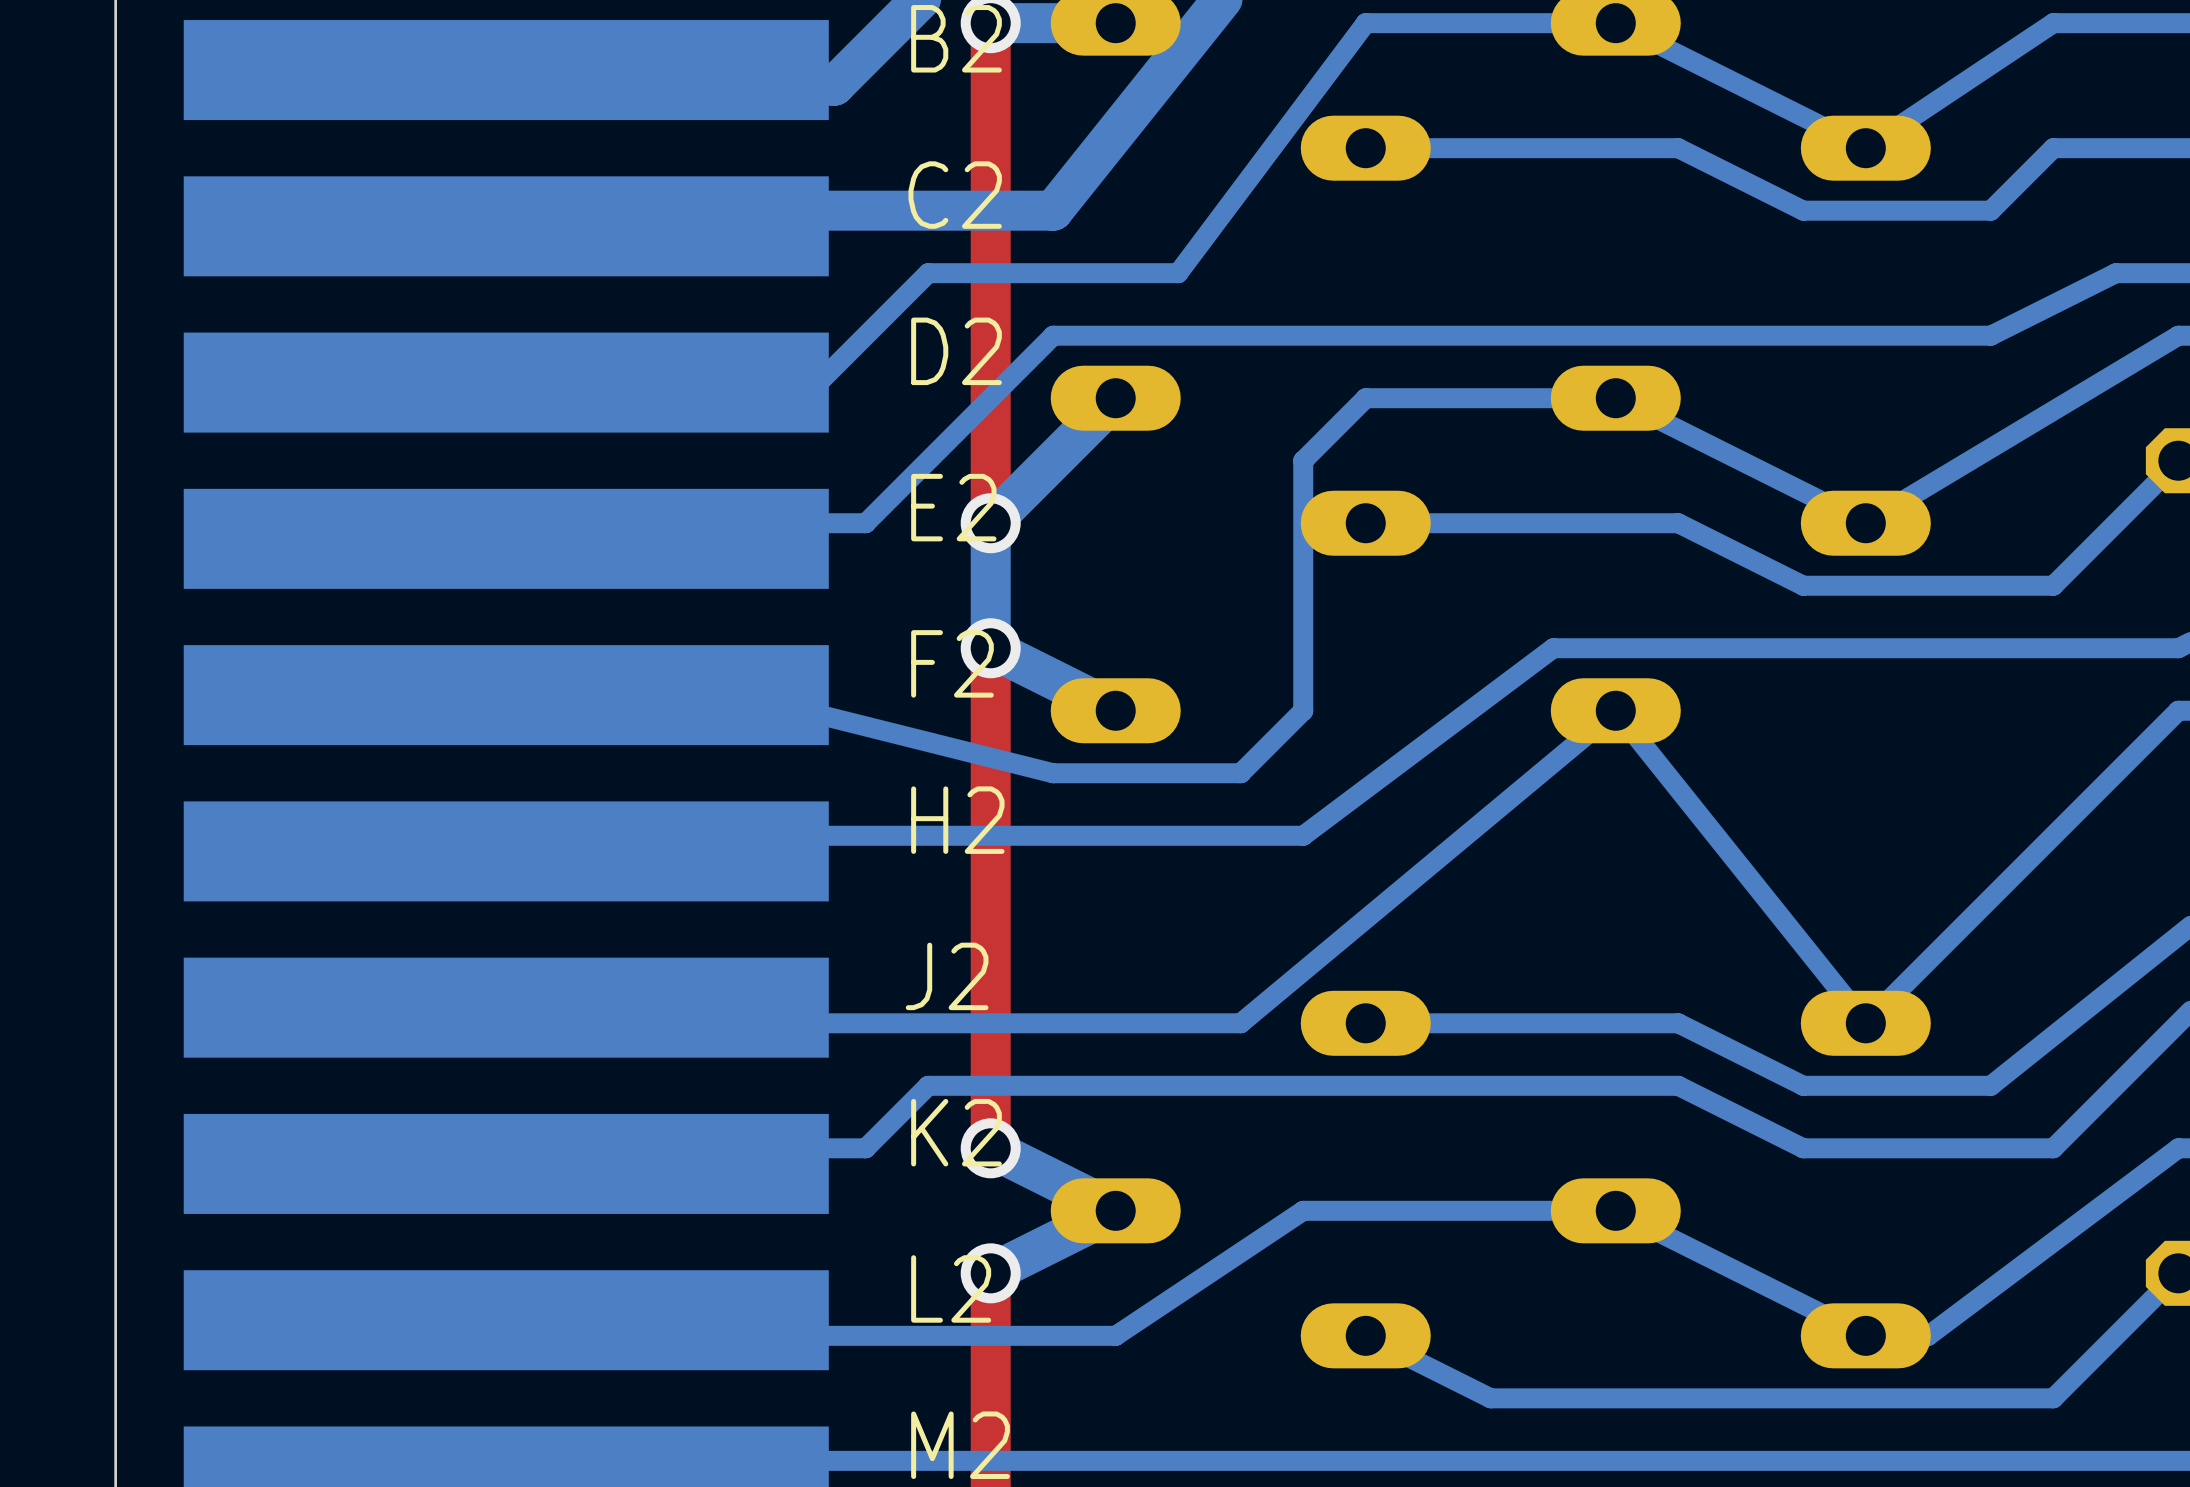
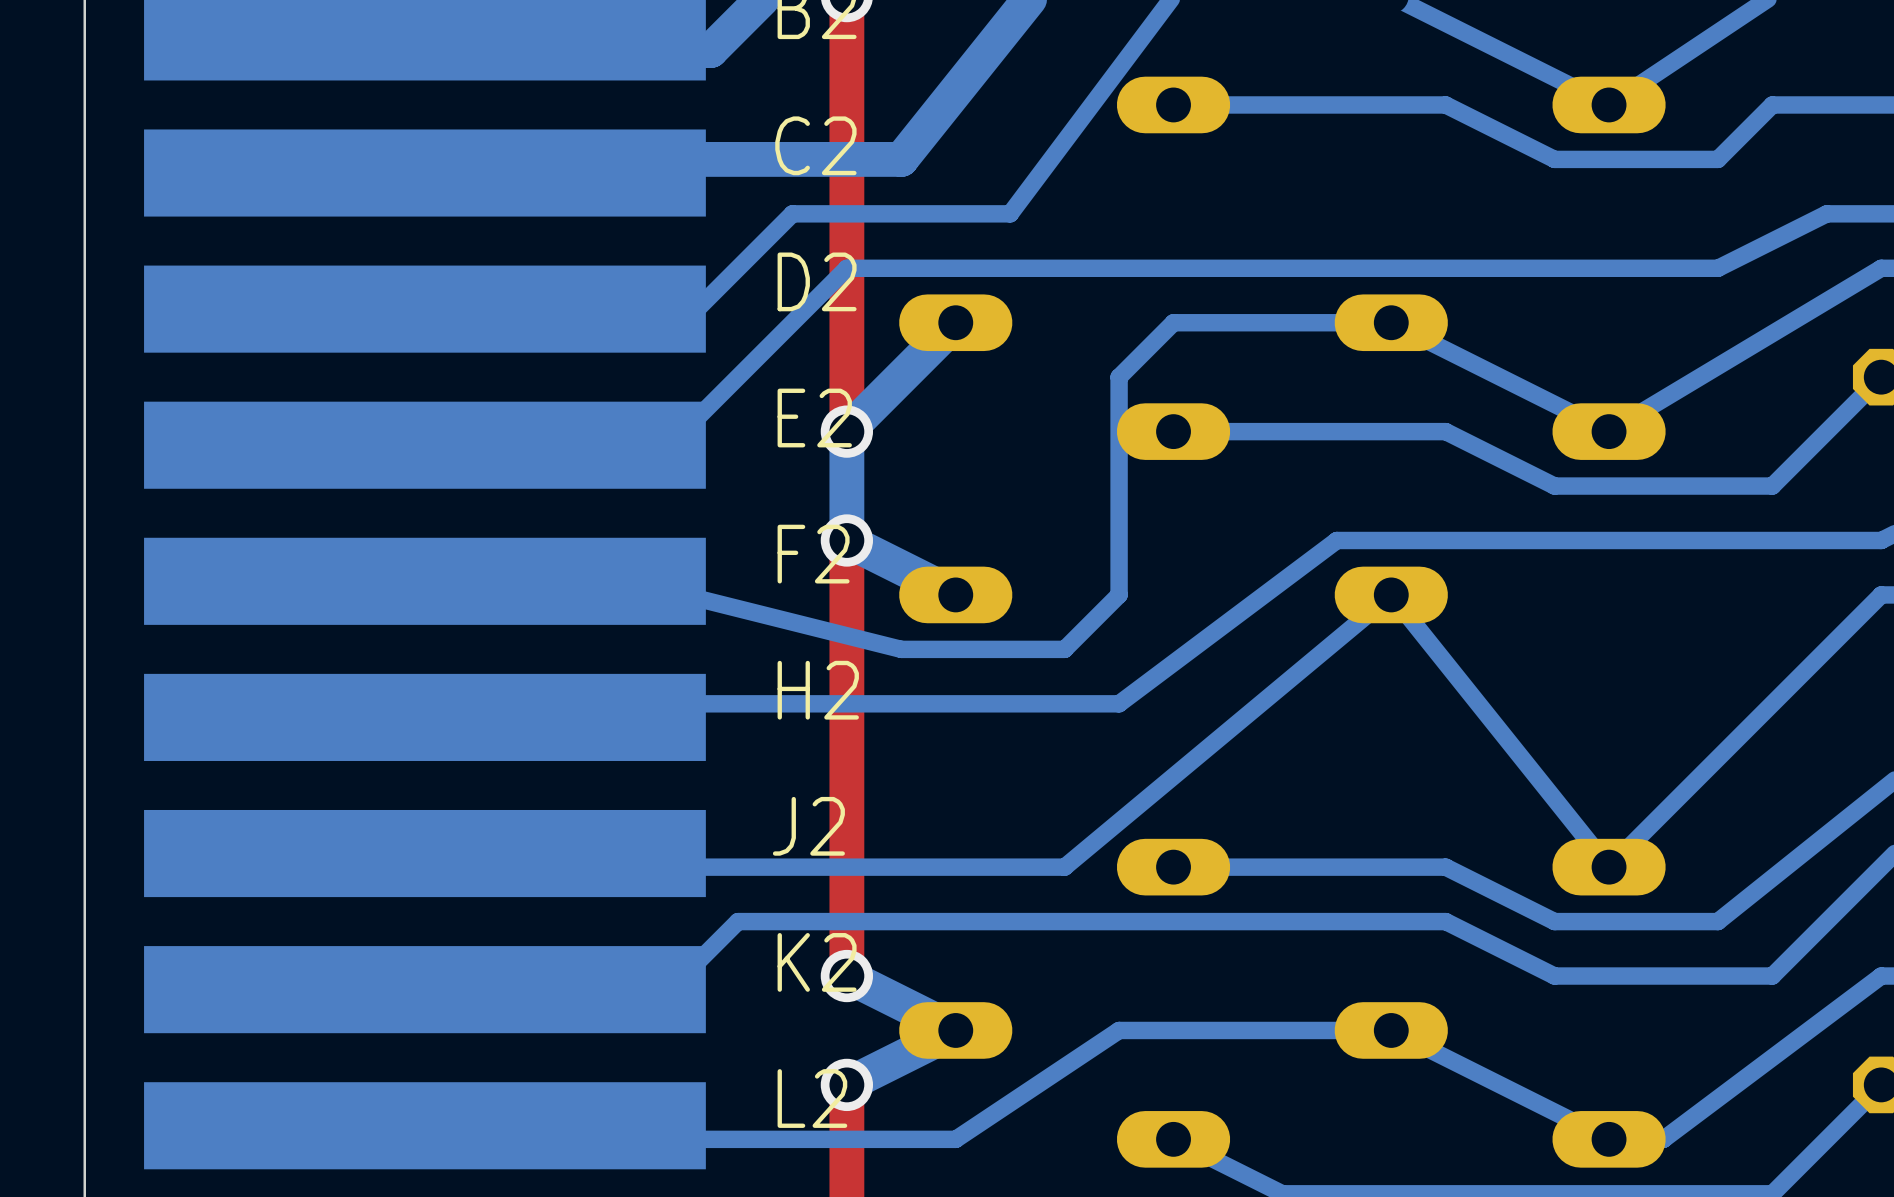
bottom track: (1053, 335) (865, 523) (803, 523) -> (901, 268) (846, 268) (683, 431)
bottom track: (928, 1085) (865, 1148) (803, 1148) -> (792, 921) (737, 921) (683, 976)

